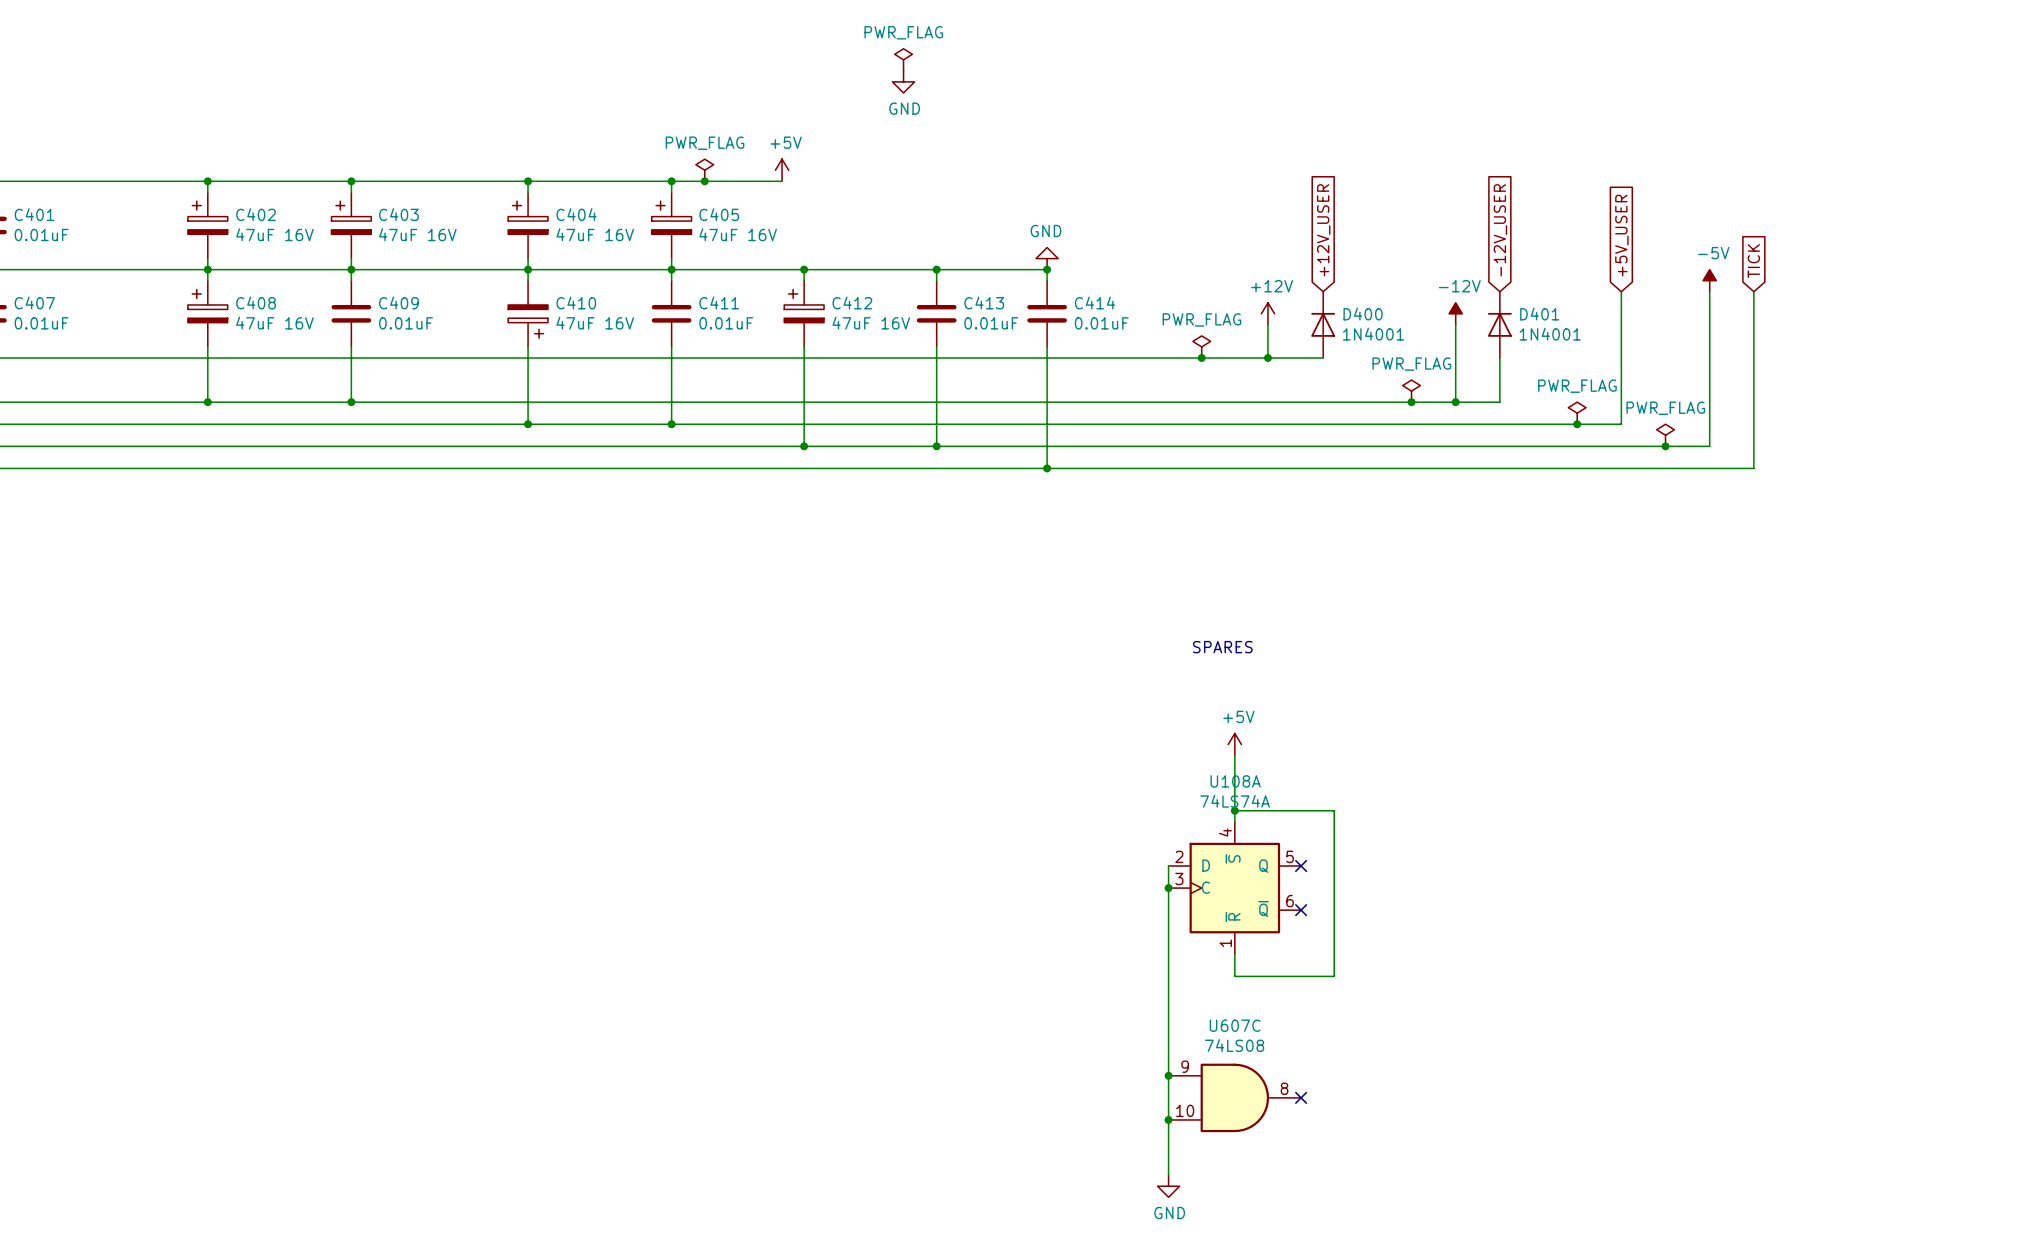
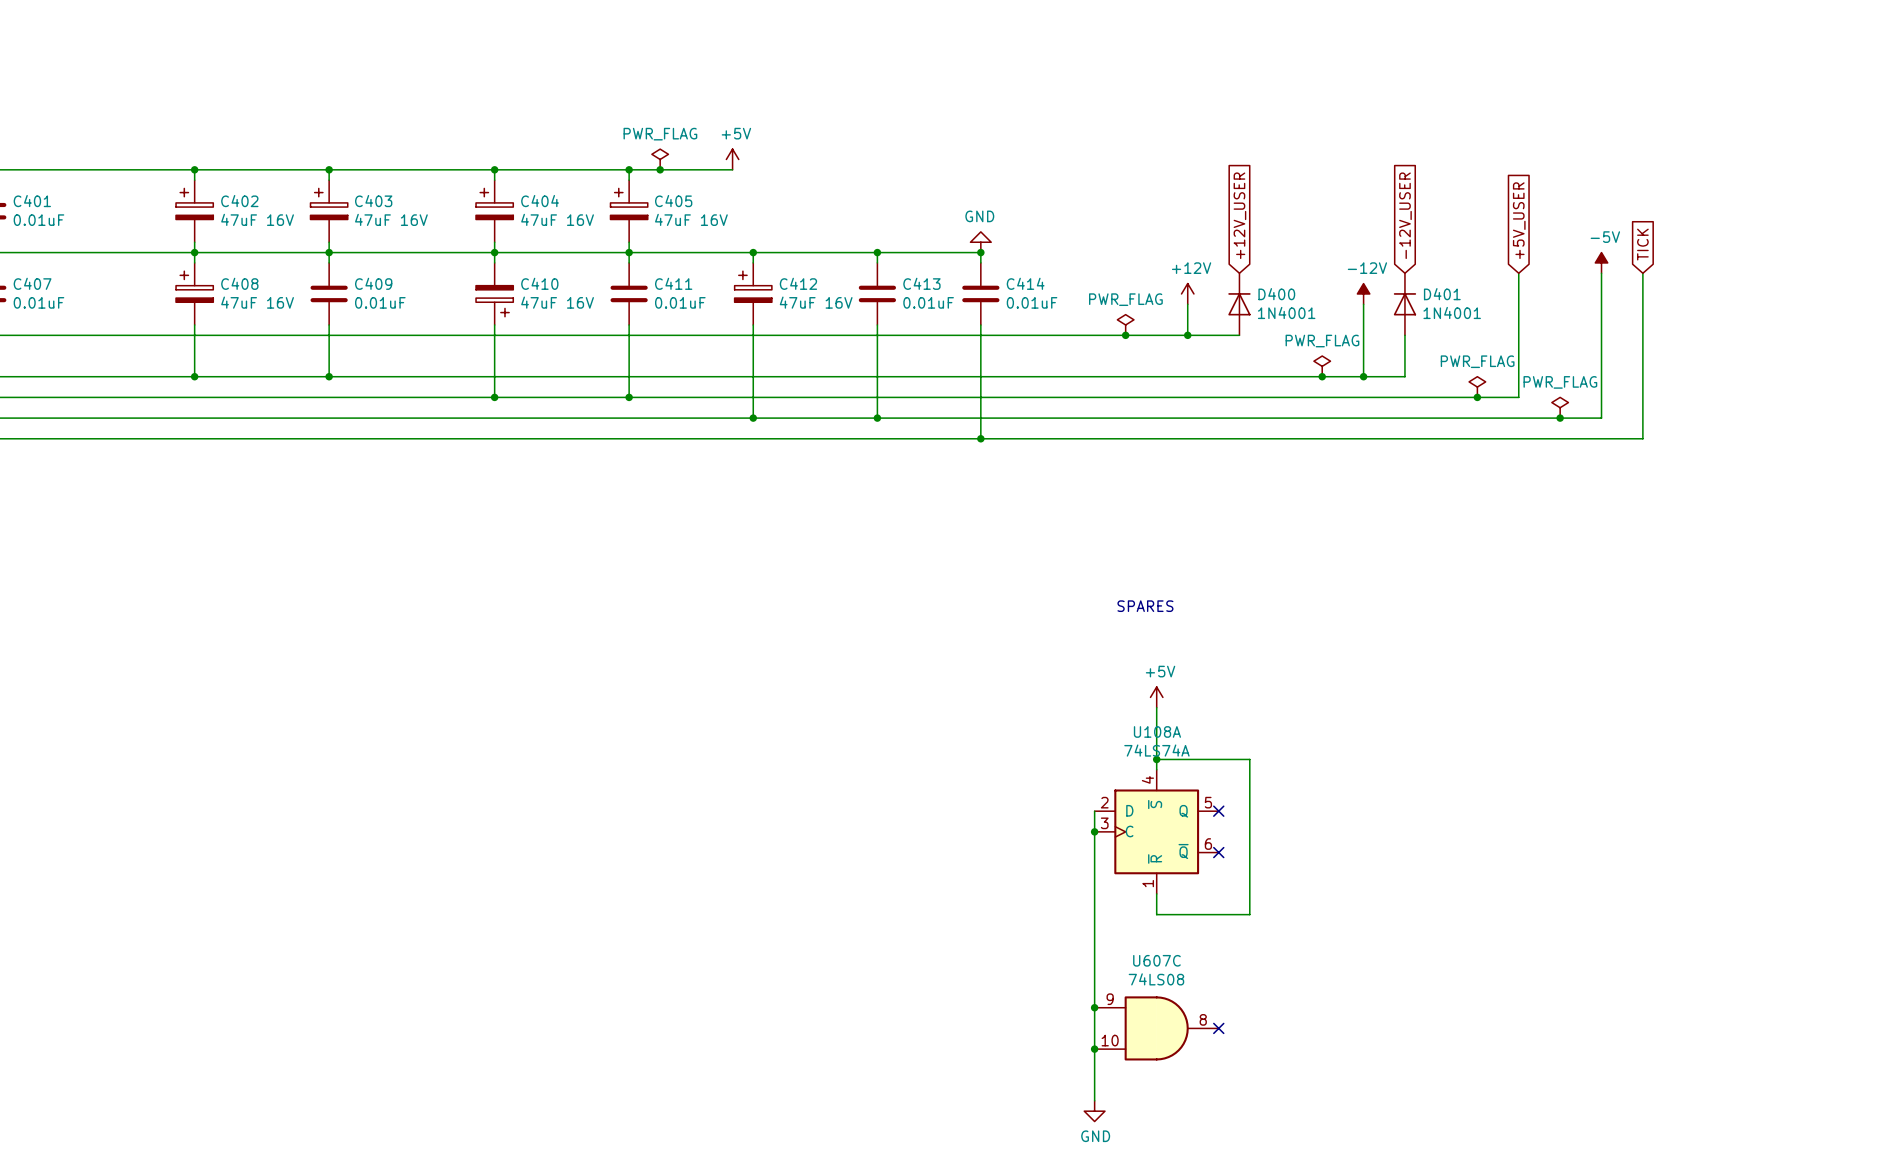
power symbol: PWR_FLAG (903, 59) -> none
power symbol: GND (903, 81) -> none

